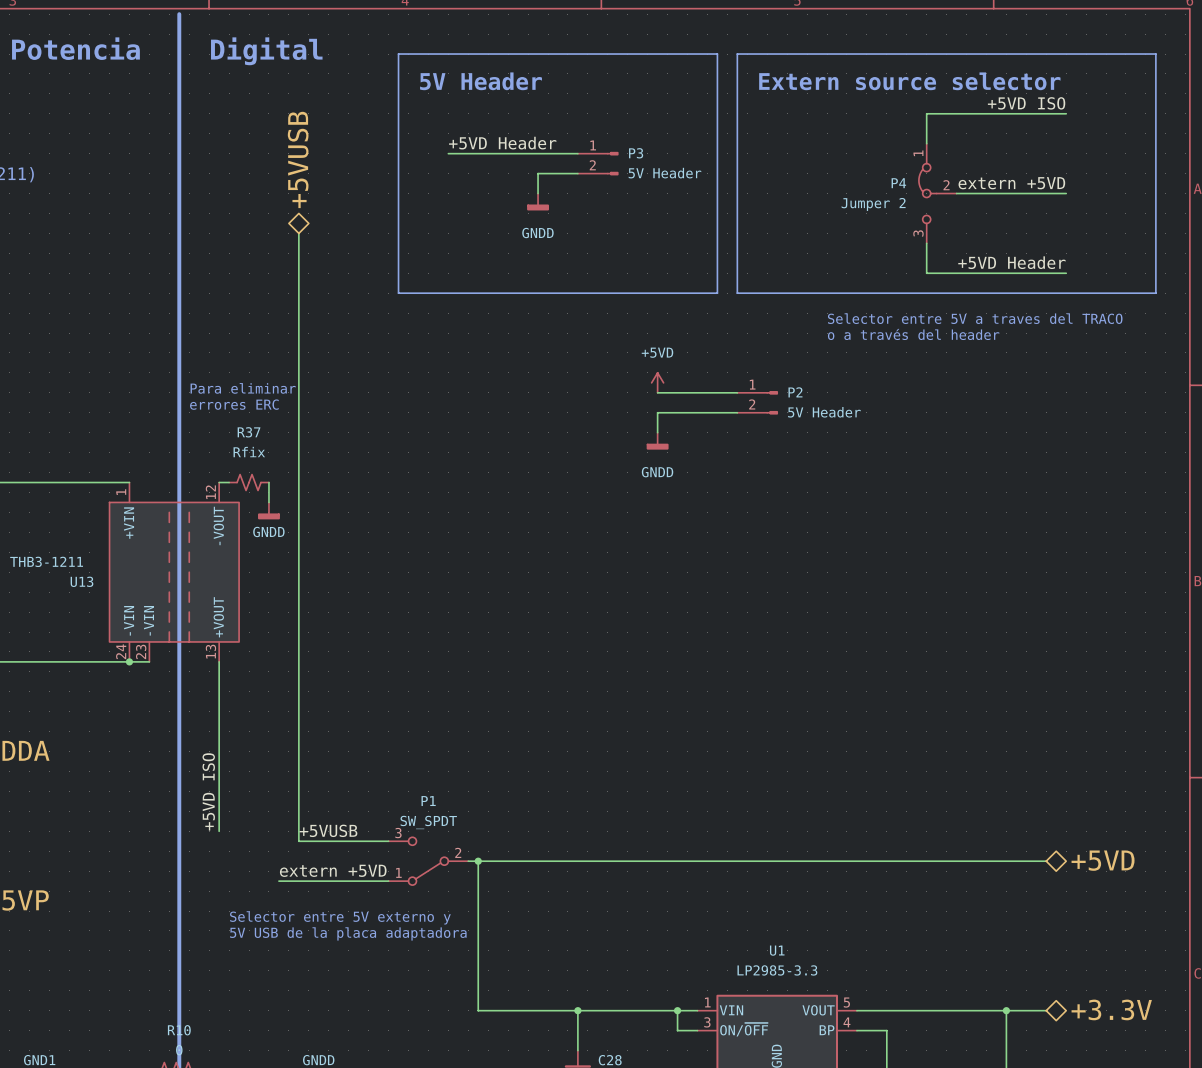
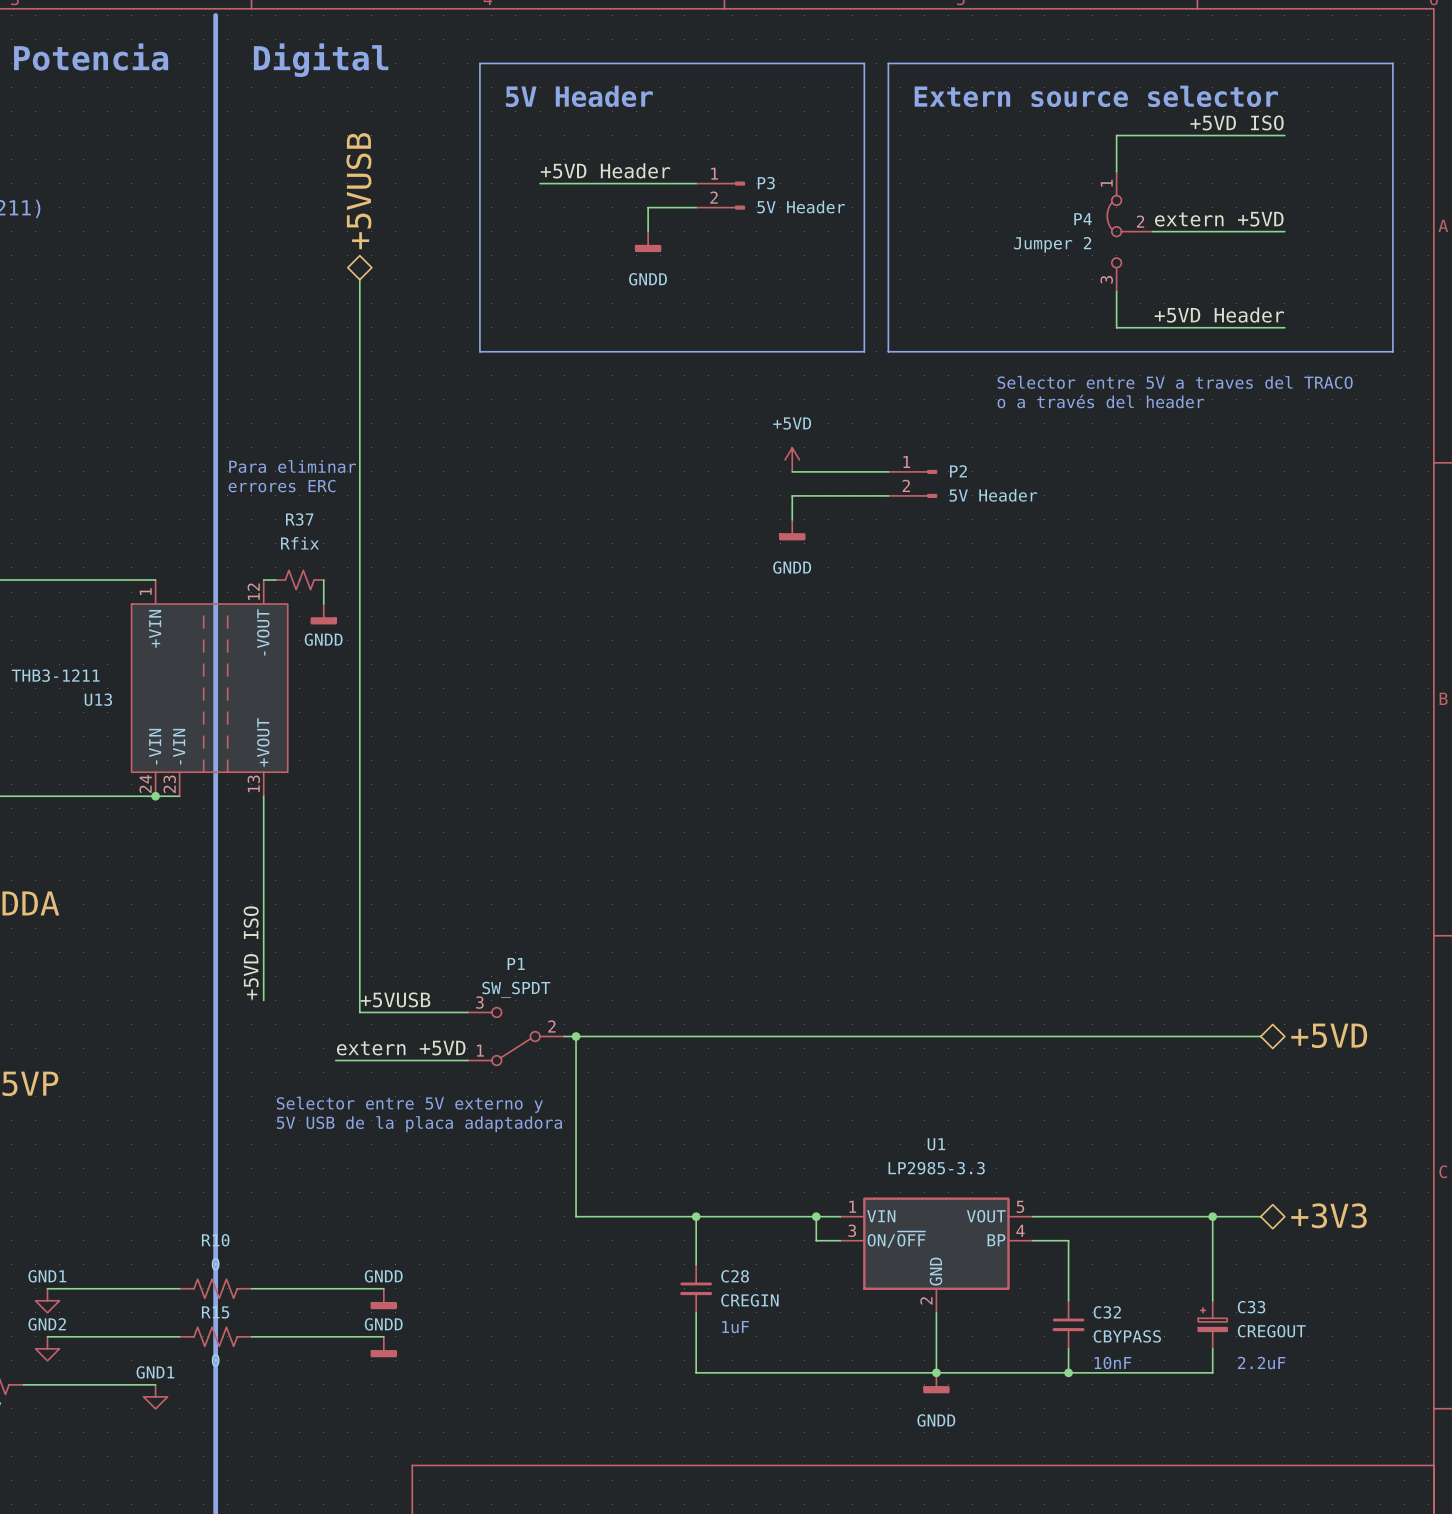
hierarchical label: +3.3V (1111, 1009) -> +3V3 (1328, 1215)

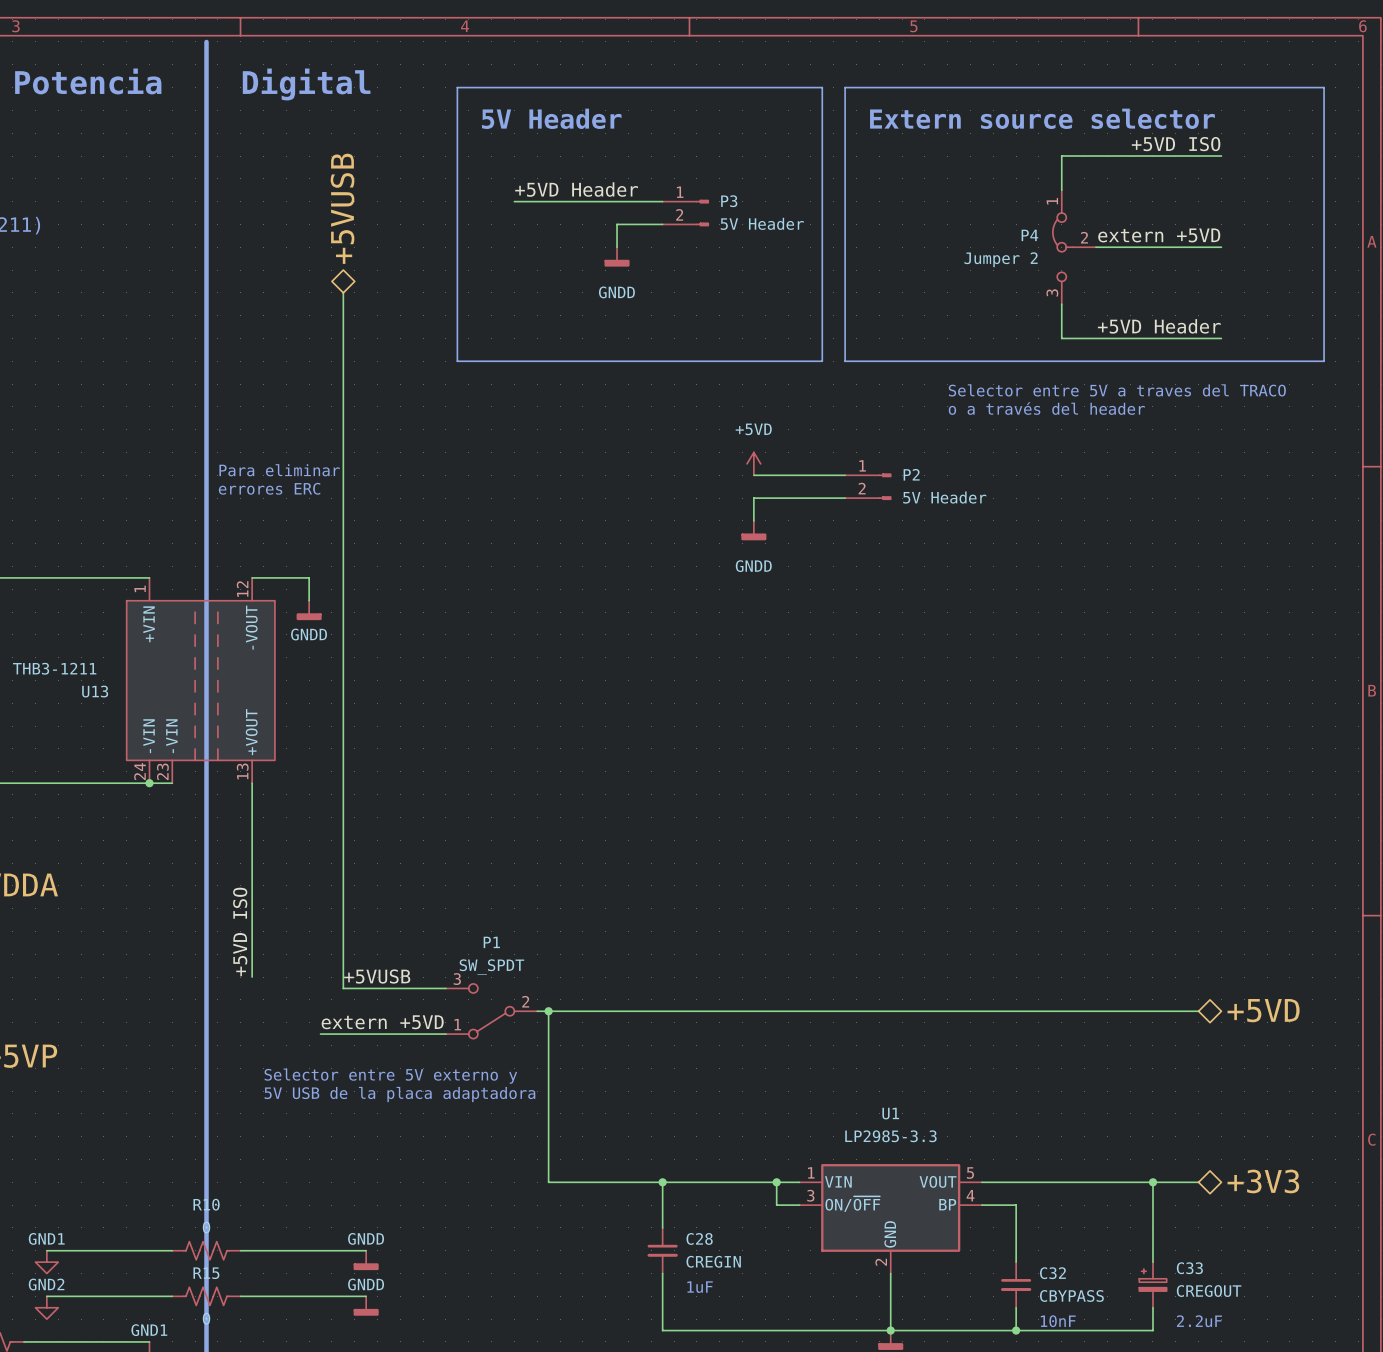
R37: Rfix (299, 580) -> none

